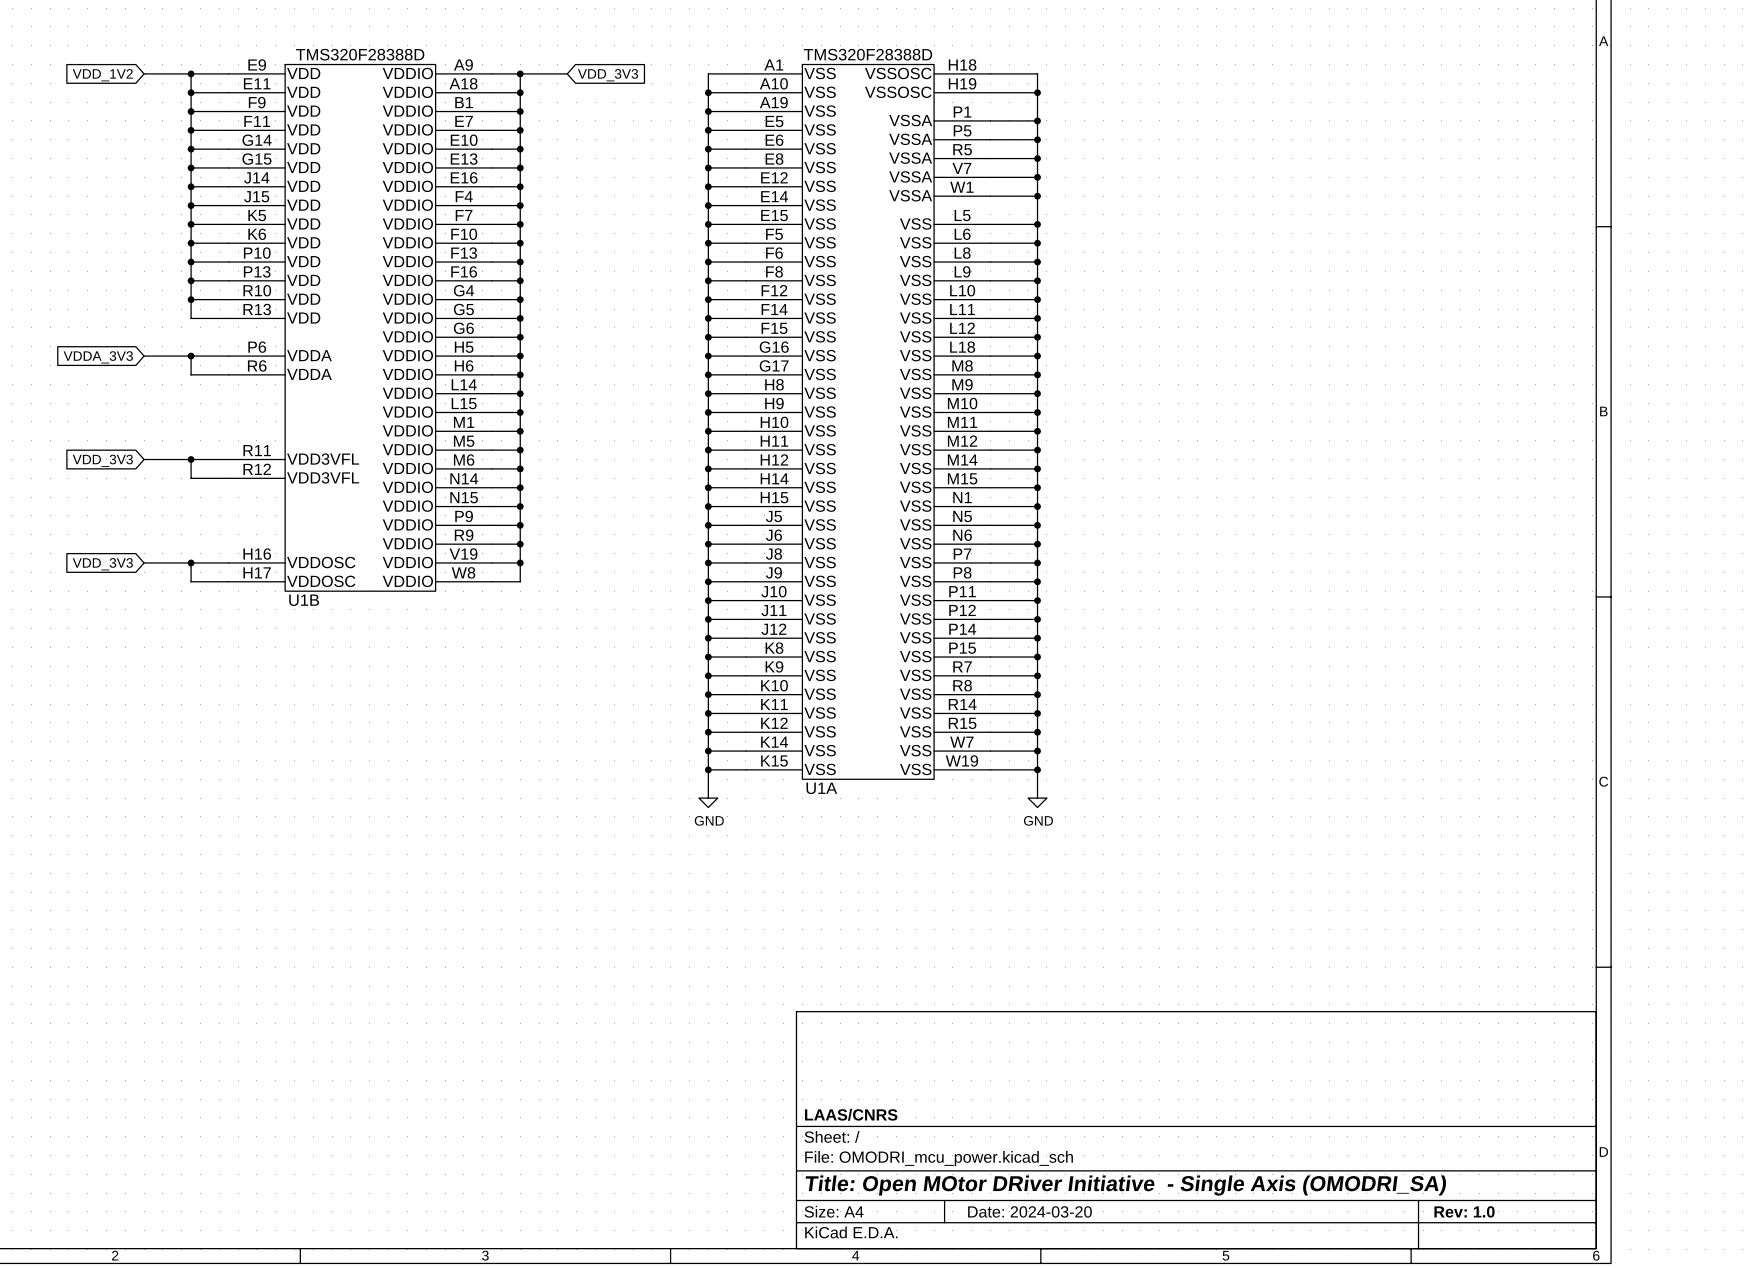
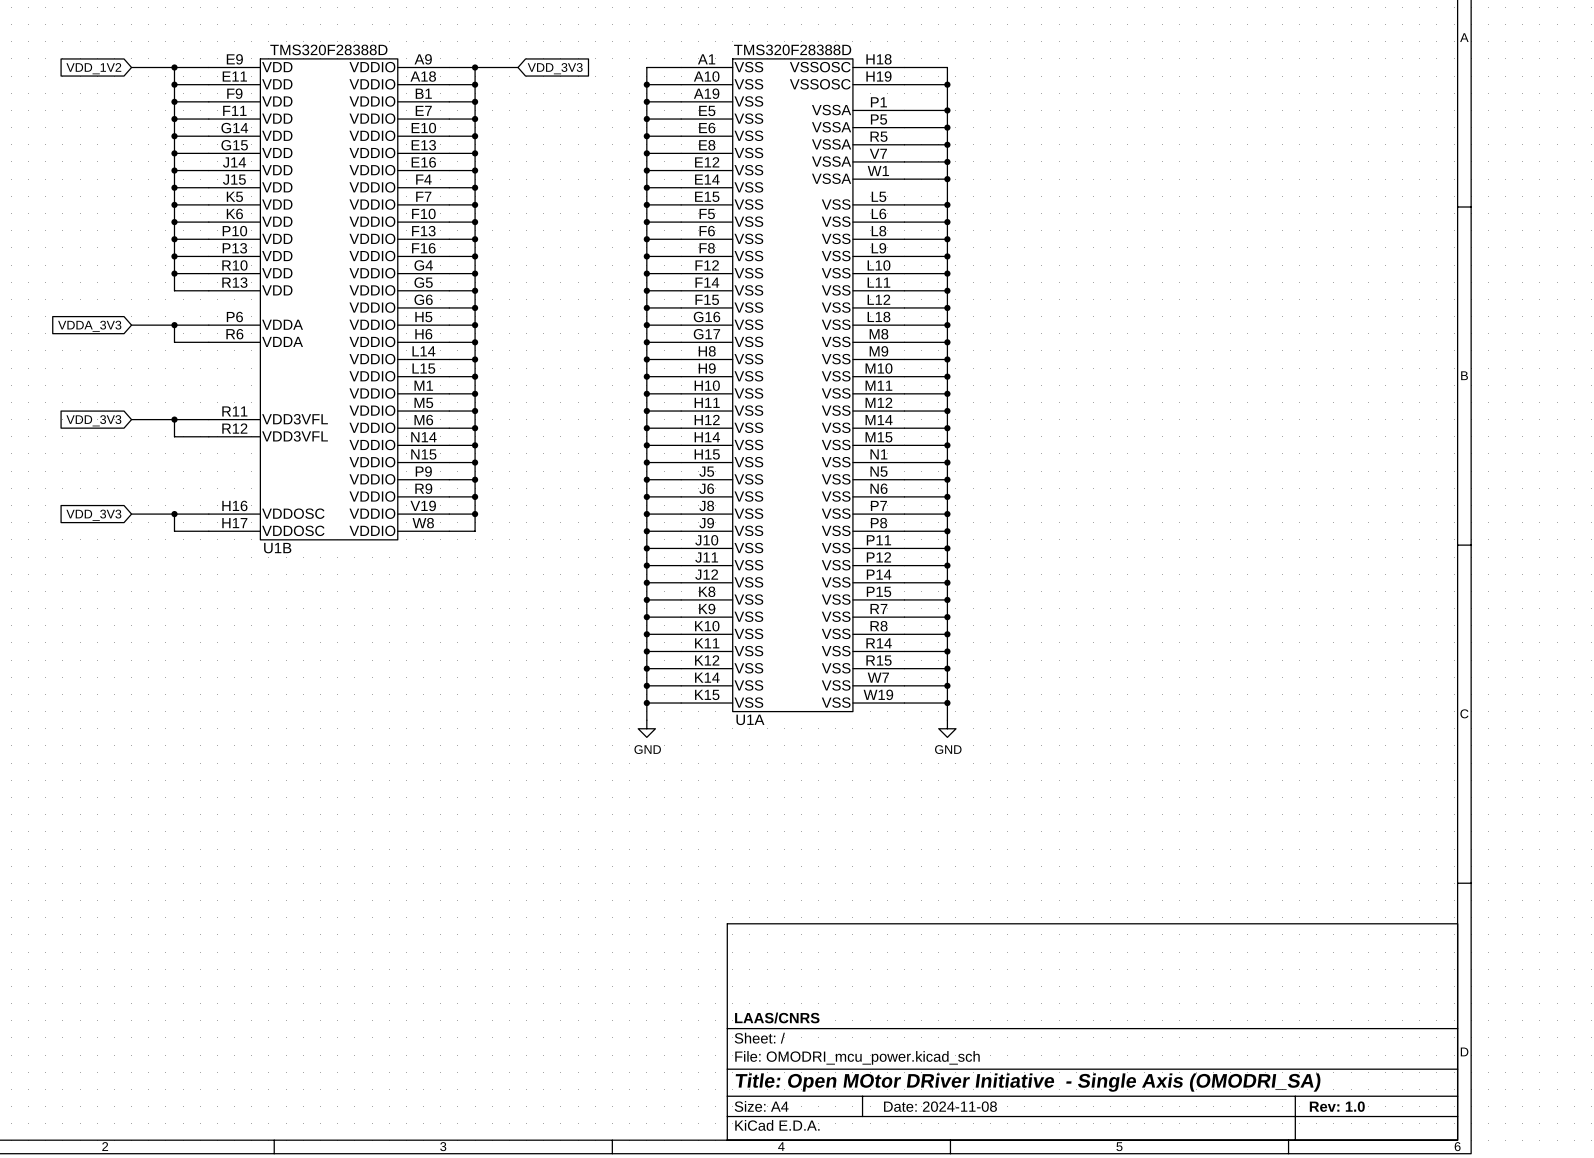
title block: Date: 2024-03-20 (1029, 1211) -> Date: 2024-11-08 (940, 1106)

